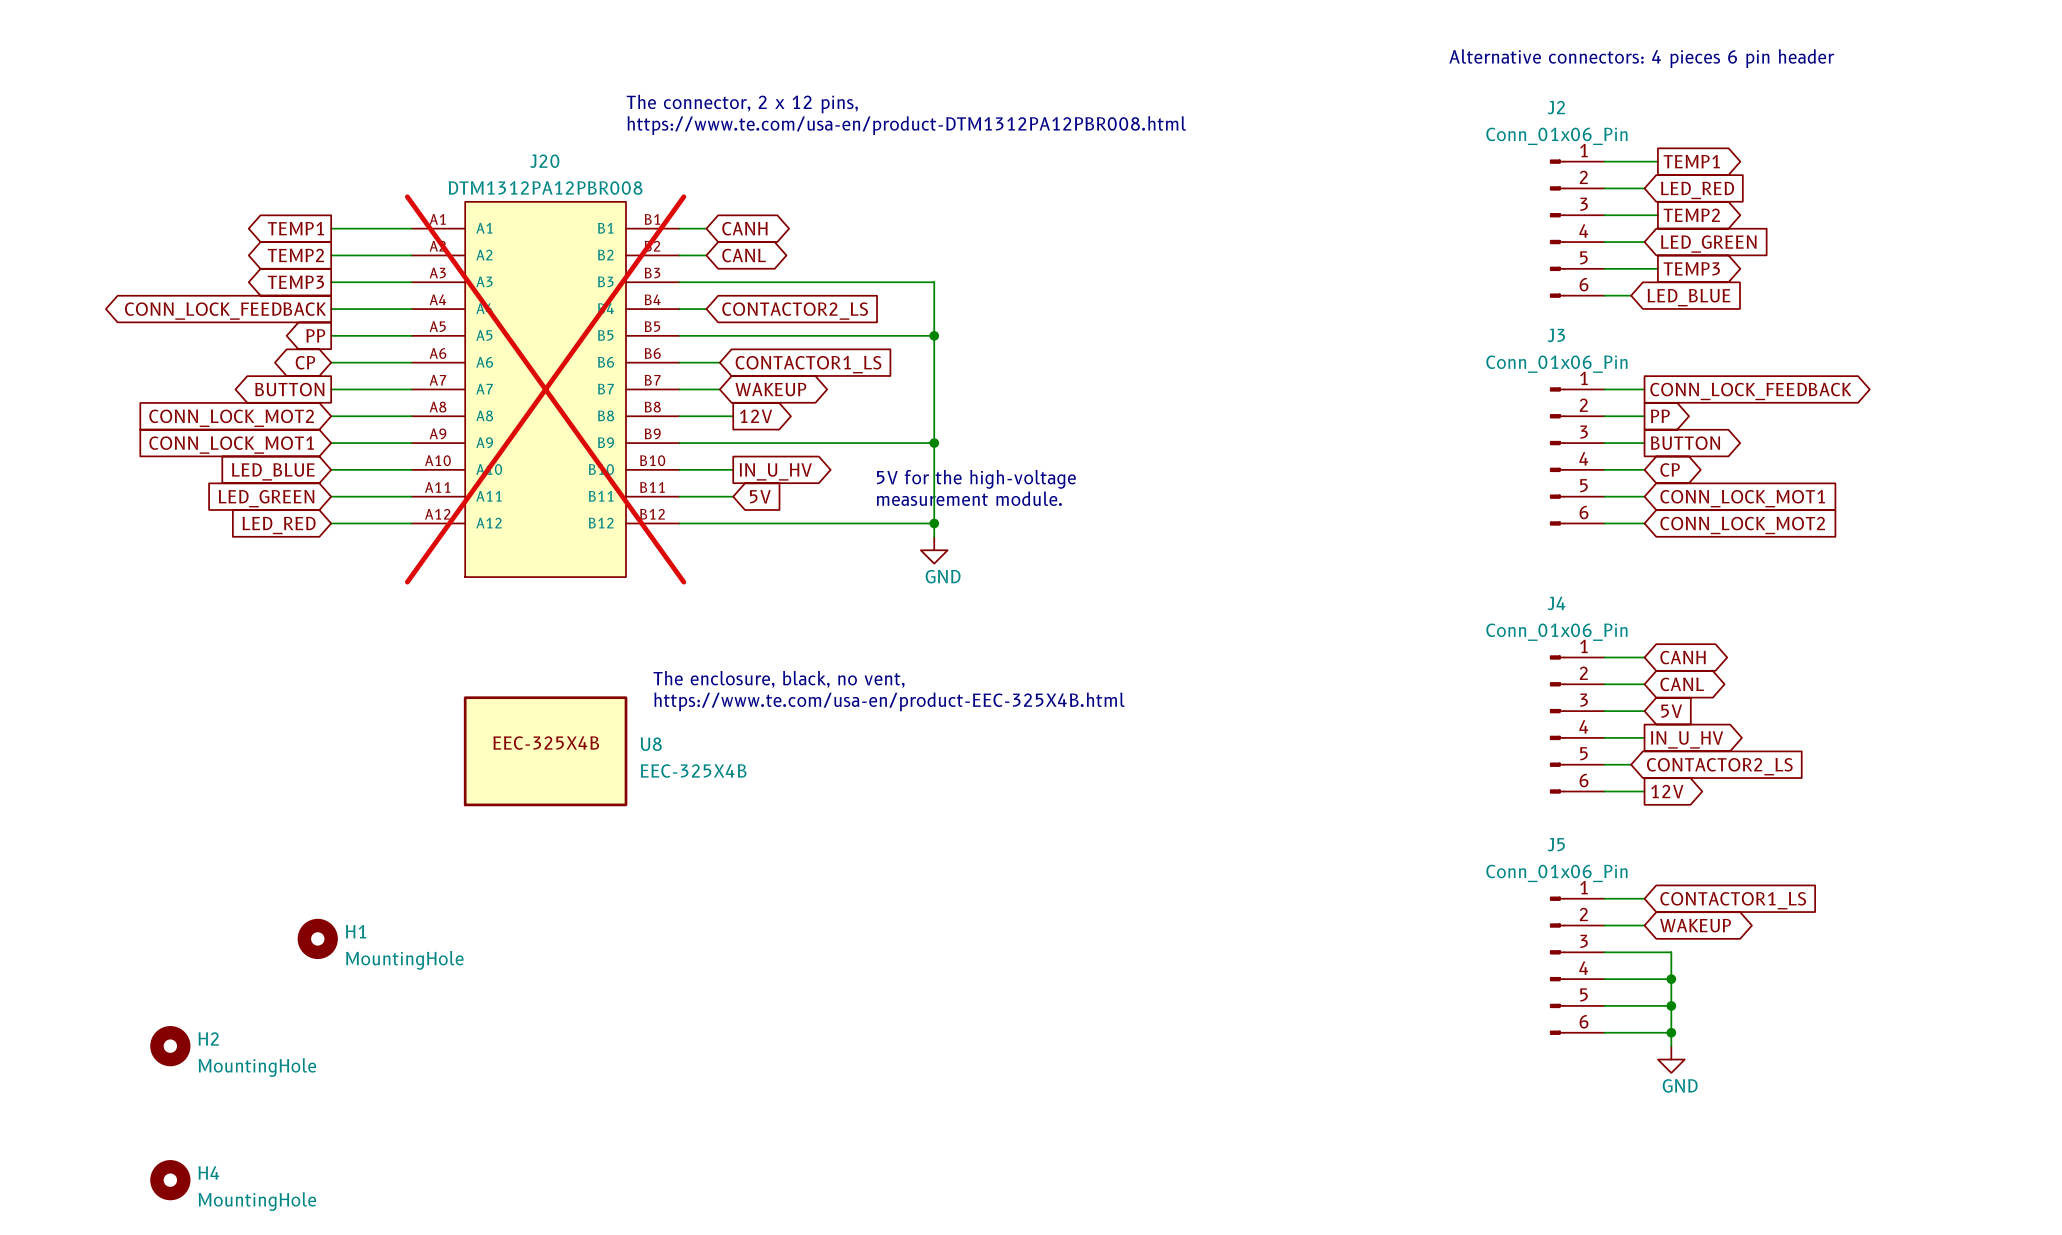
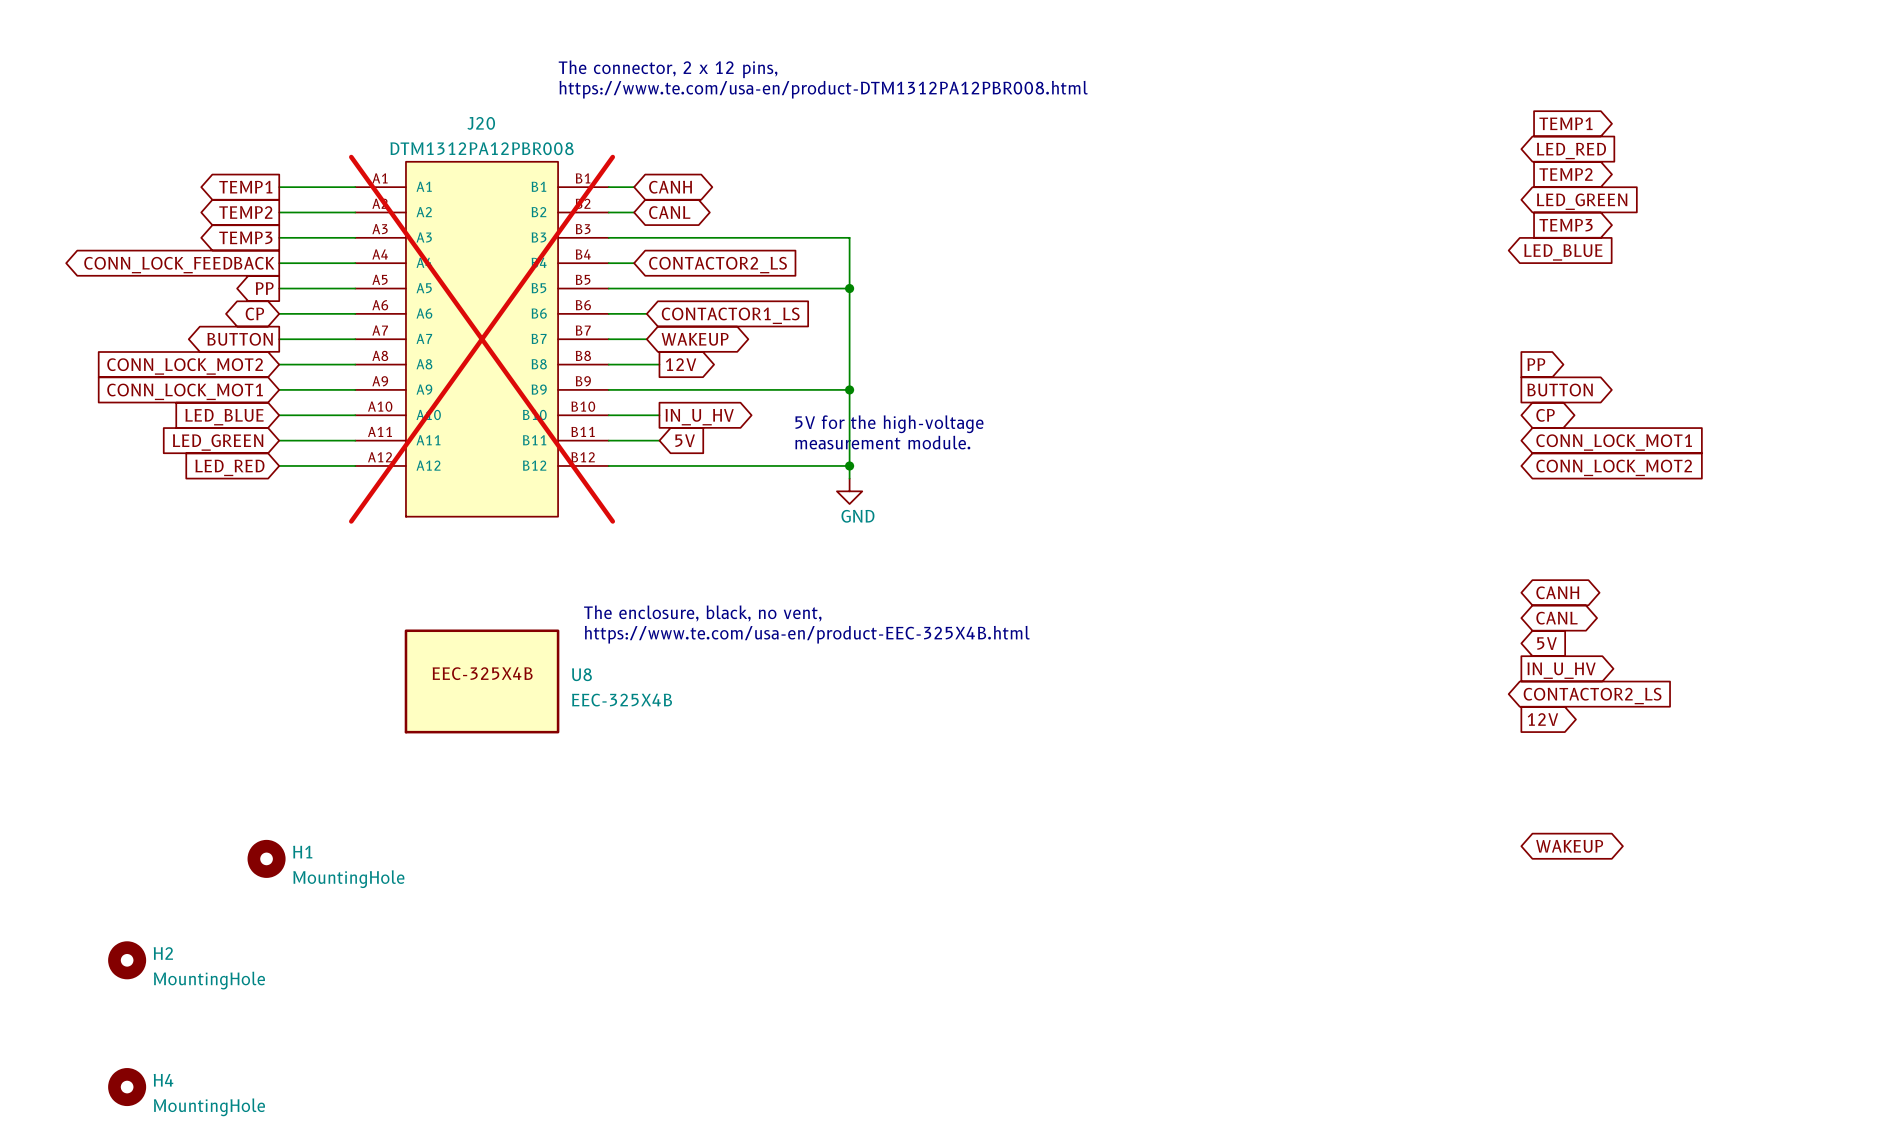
text: Alternative connectors: 4 pieces 6 pin header (1641, 58) -> none
wire: (1604, 161) (1657, 161) -> none
wire: (1604, 188) (1644, 188) -> none
wire: (1604, 215) (1657, 215) -> none
J2: Conn_01x06_Pin (1577, 228) -> none
wire: (1604, 242) (1644, 242) -> none
wire: (1604, 268) (1657, 268) -> none
wire: (1604, 295) (1631, 295) -> none
wire: (1604, 389) (1644, 389) -> none
global label: CONN_LOCK_FEEDBACK (1750, 391) -> none
wire: (1604, 416) (1644, 416) -> none
wire: (1604, 443) (1644, 443) -> none
J3: Conn_01x06_Pin (1577, 456) -> none
wire: (1604, 469) (1644, 469) -> none
wire: (1604, 496) (1644, 496) -> none
wire: (1604, 523) (1644, 523) -> none
wire: (1604, 657) (1644, 657) -> none
wire: (1604, 684) (1644, 684) -> none
wire: (1604, 711) (1644, 711) -> none
J4: Conn_01x06_Pin (1577, 724) -> none
wire: (1604, 737) (1644, 737) -> none
wire: (1604, 764) (1631, 764) -> none
wire: (1604, 791) (1644, 791) -> none
wire: (1604, 898) (1644, 898) -> none
global label: CONTACTOR1_LS (1733, 900) -> none
wire: (1604, 925) (1644, 925) -> none
wire: (1604, 952) (1671, 952) (1671, 1046) -> none
J5: Conn_01x06_Pin (1577, 965) -> none
wire: (1604, 979) (1671, 979) -> none
junction: (1671, 979) -> none
wire: (1604, 1005) (1671, 1005) -> none
junction: (1671, 1005) -> none
wire: (1604, 1032) (1671, 1032) -> none
junction: (1671, 1032) -> none
power symbol: GND (1671, 1059) -> none

